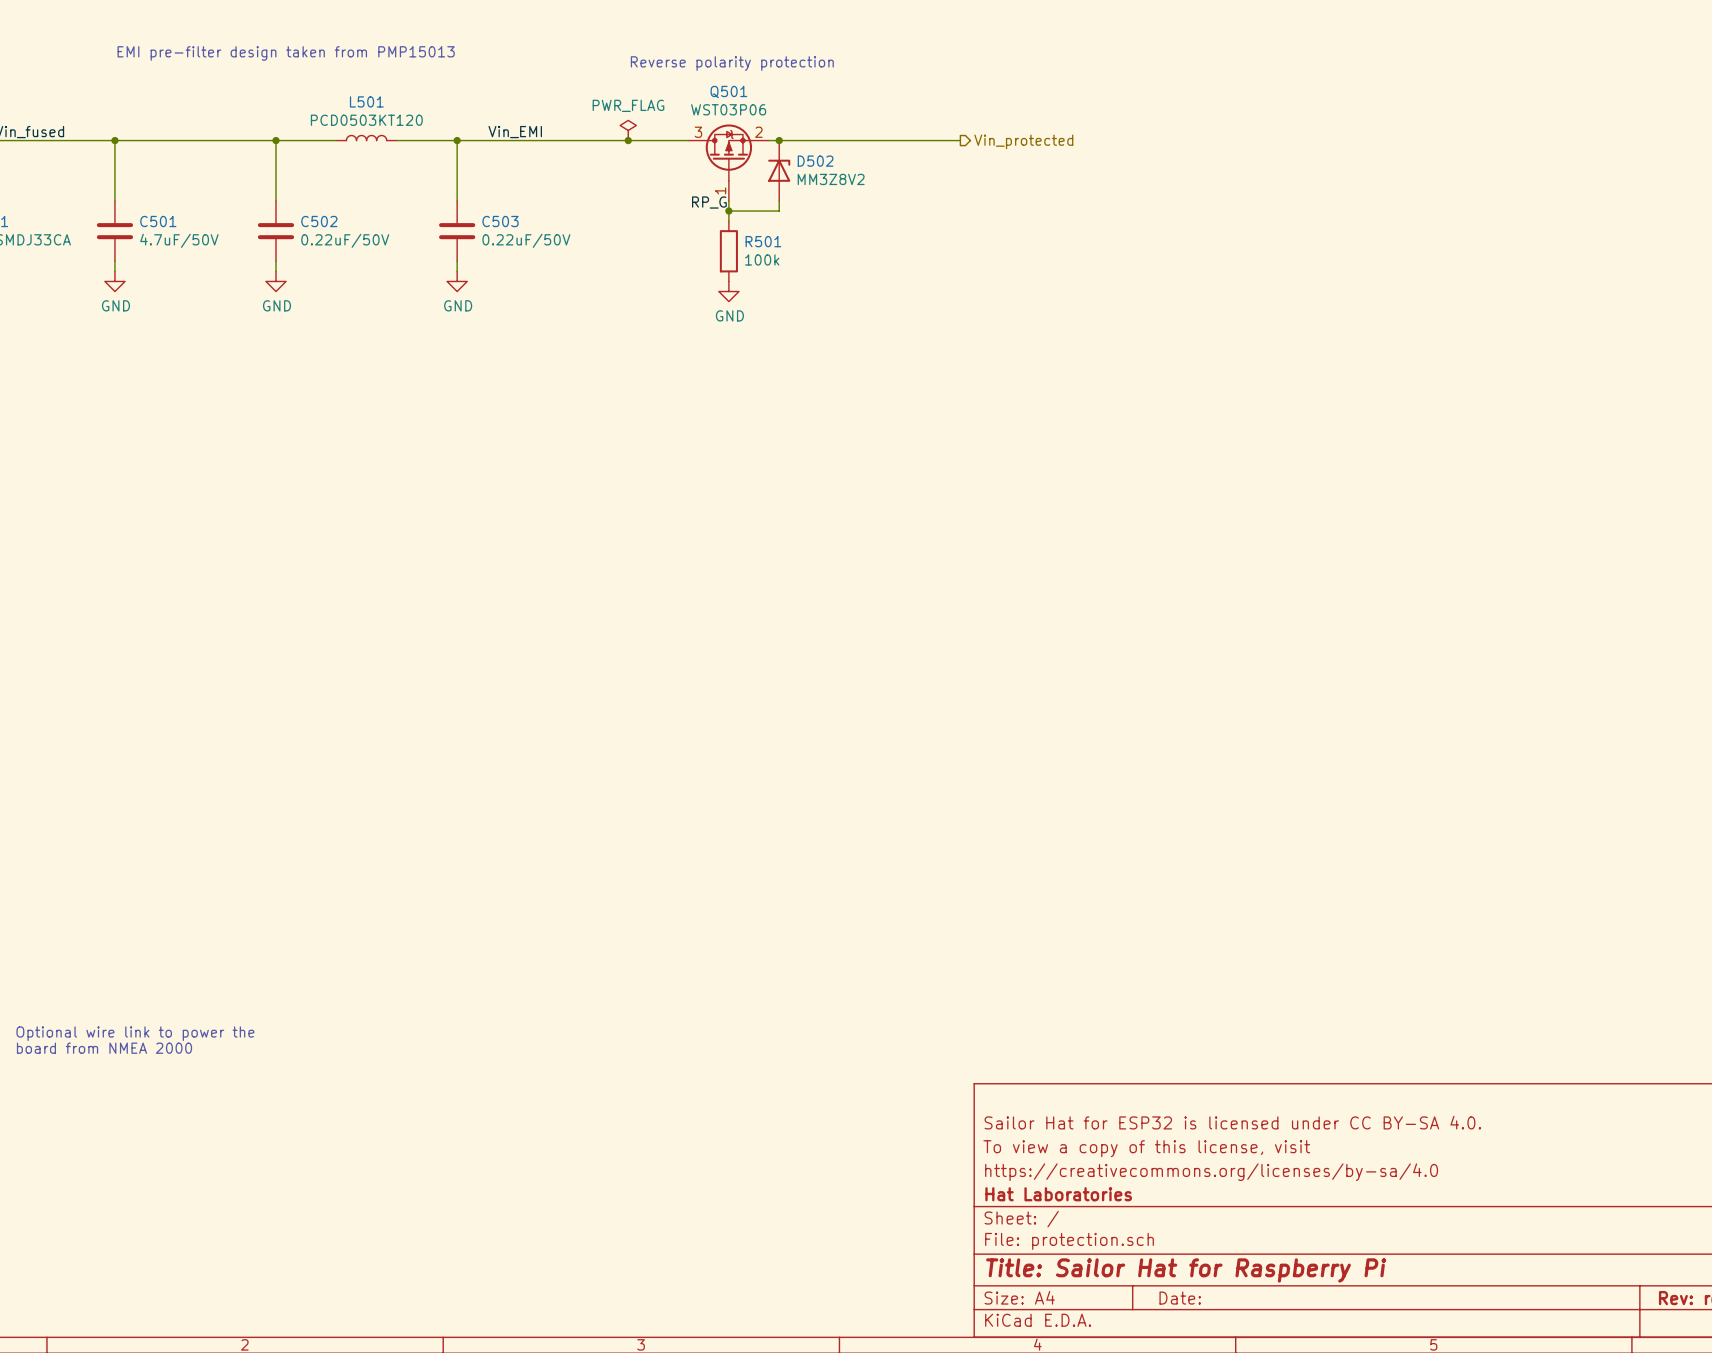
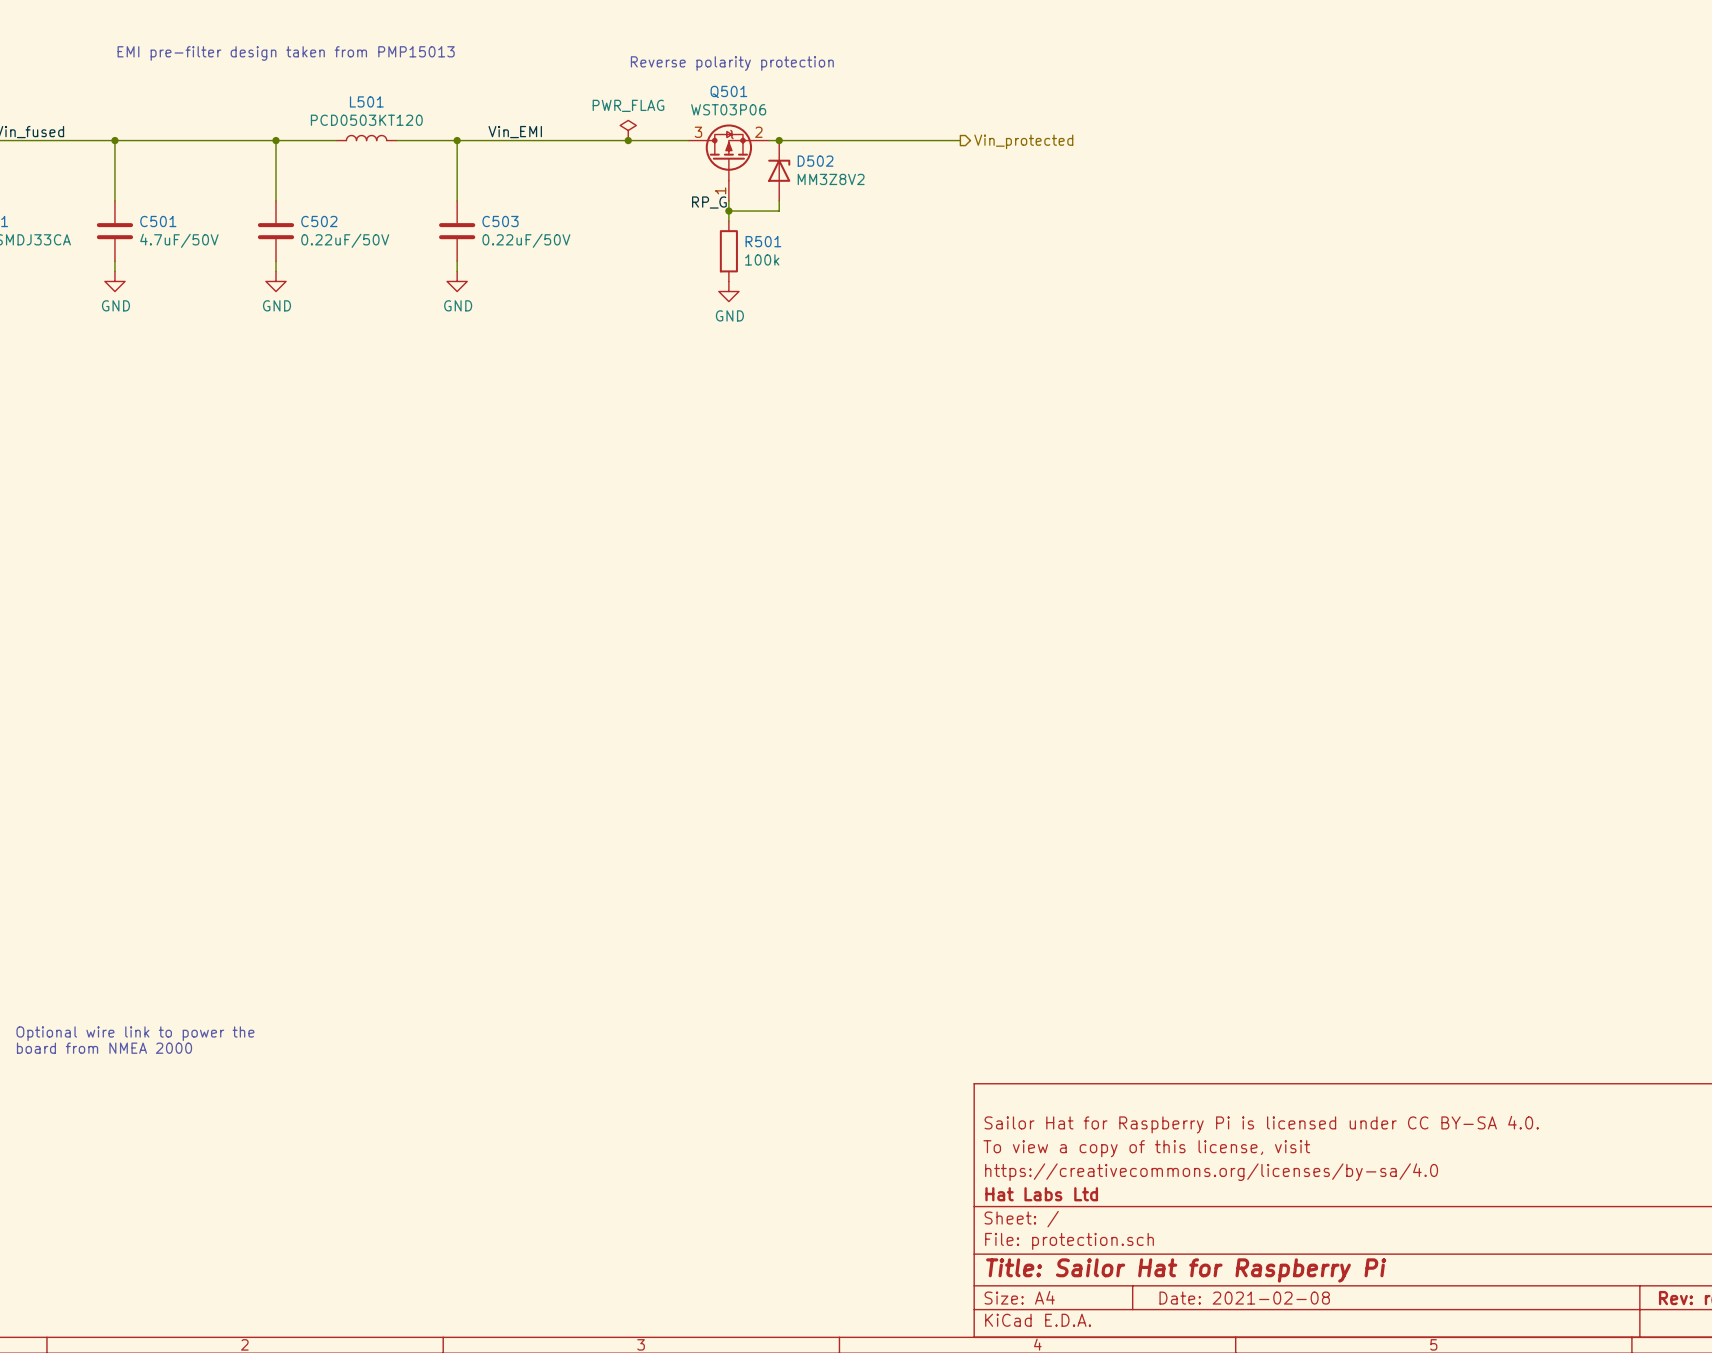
title block: Sailor Hat for ESP32 is licensed under CC BY-SA 4.0. (1232, 1122) -> Sailor Hat for Raspberry Pi is licensed under CC BY-SA 4.0. (1261, 1124)
title block: Hat Laboratories (1058, 1194) -> Hat Labs Ltd (1041, 1194)
title block: Date: (1180, 1298) -> Date: 2021-02-08 (1244, 1298)

